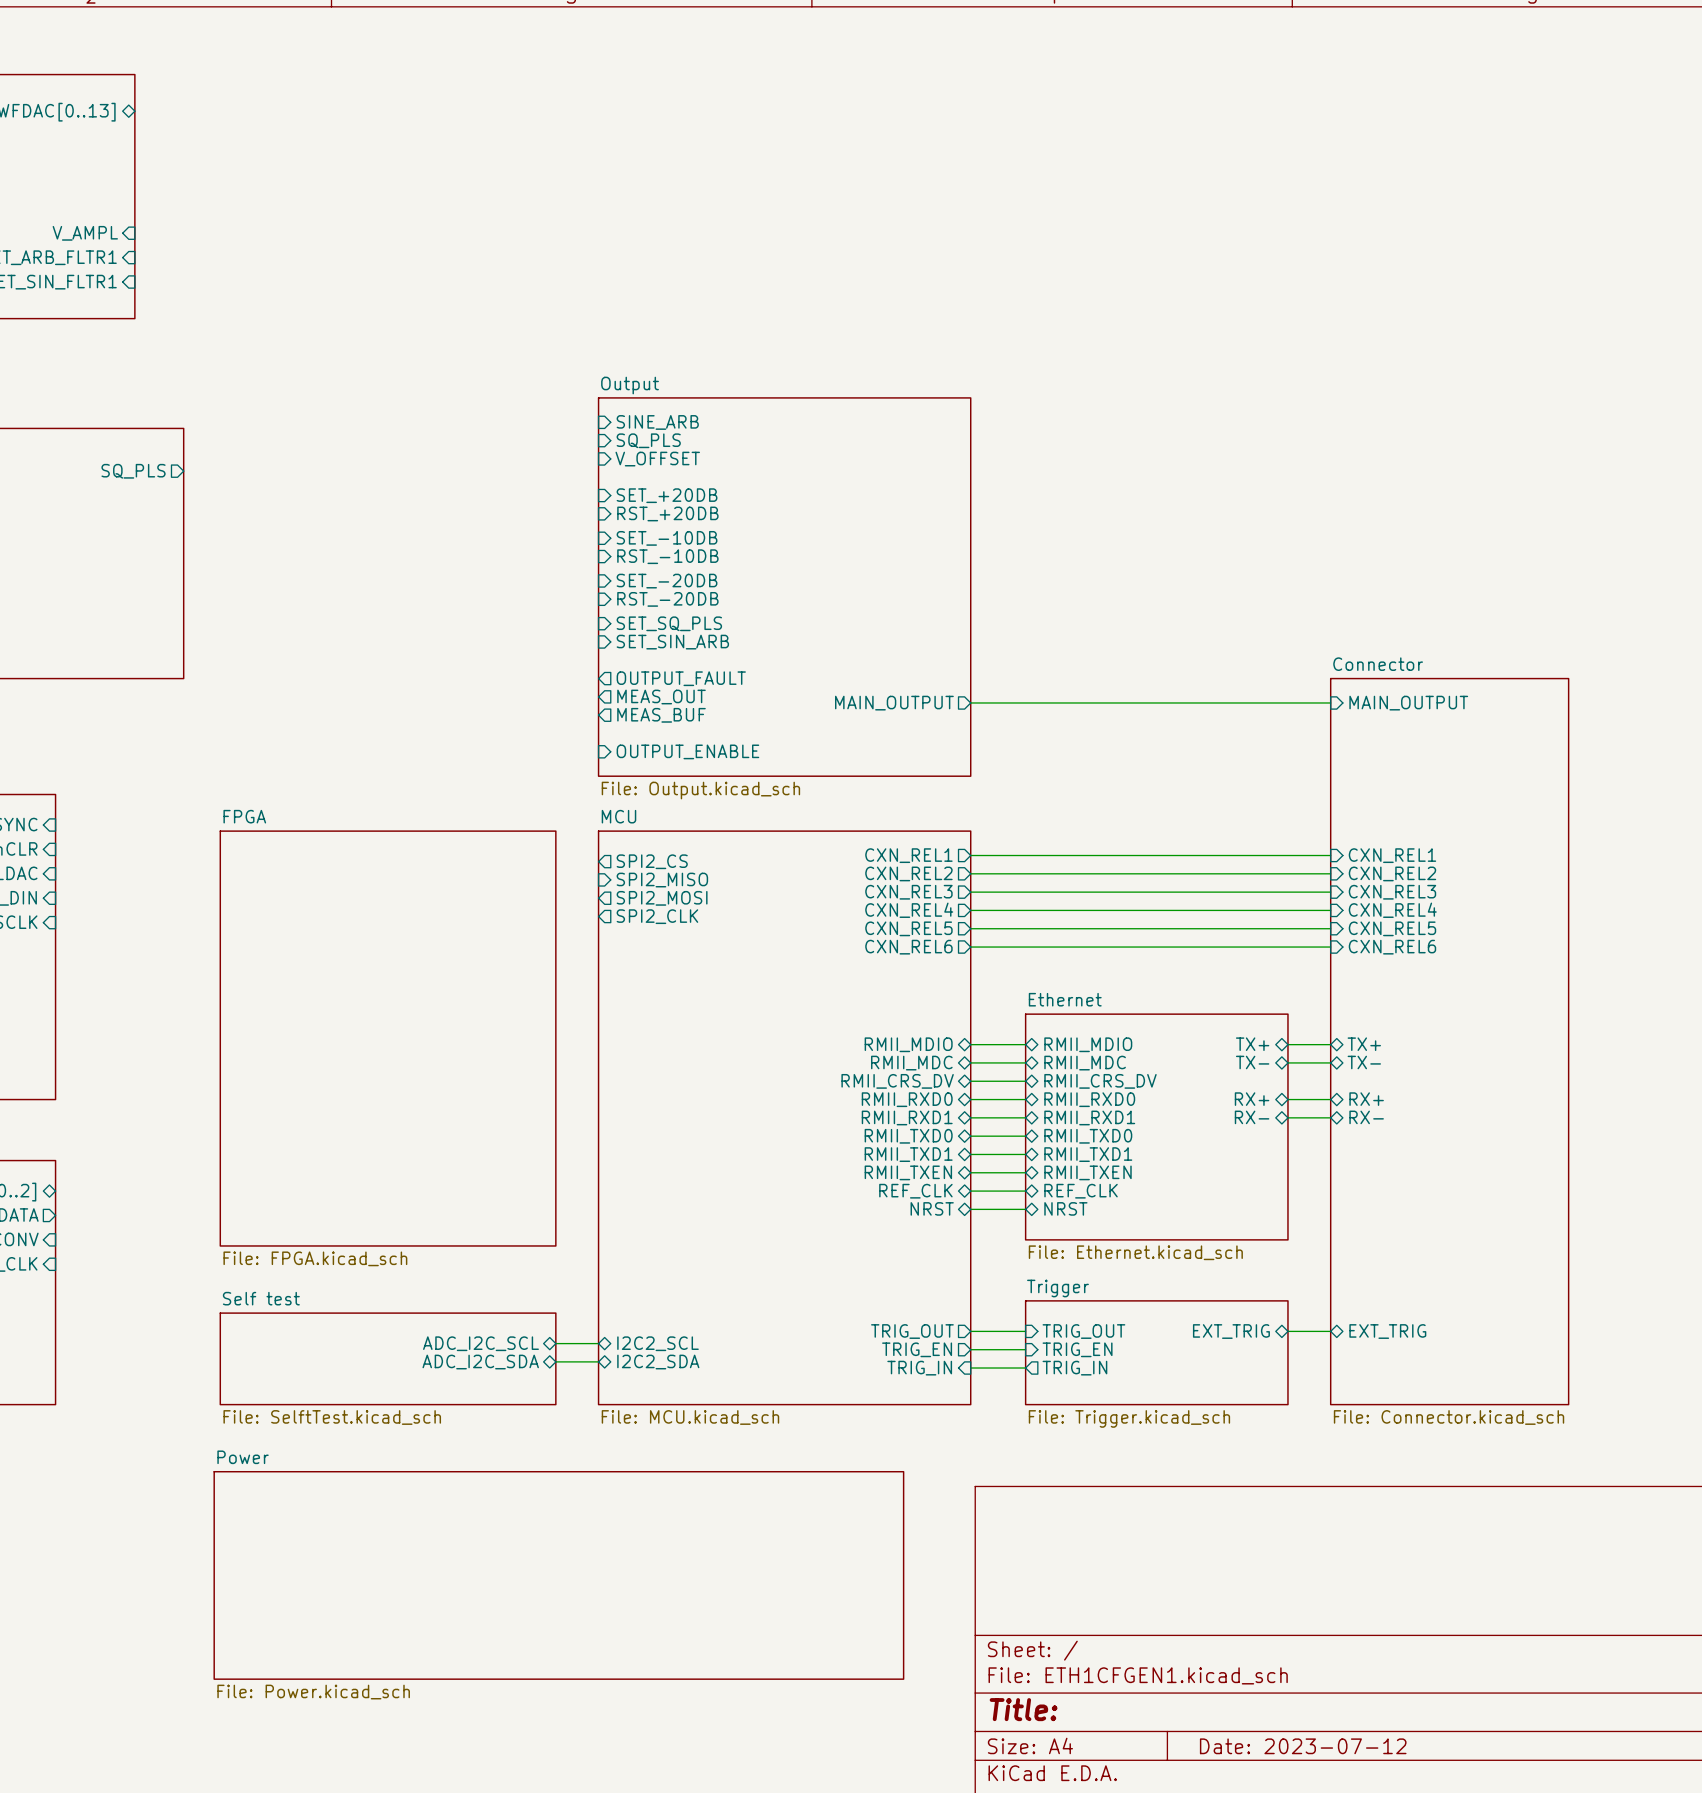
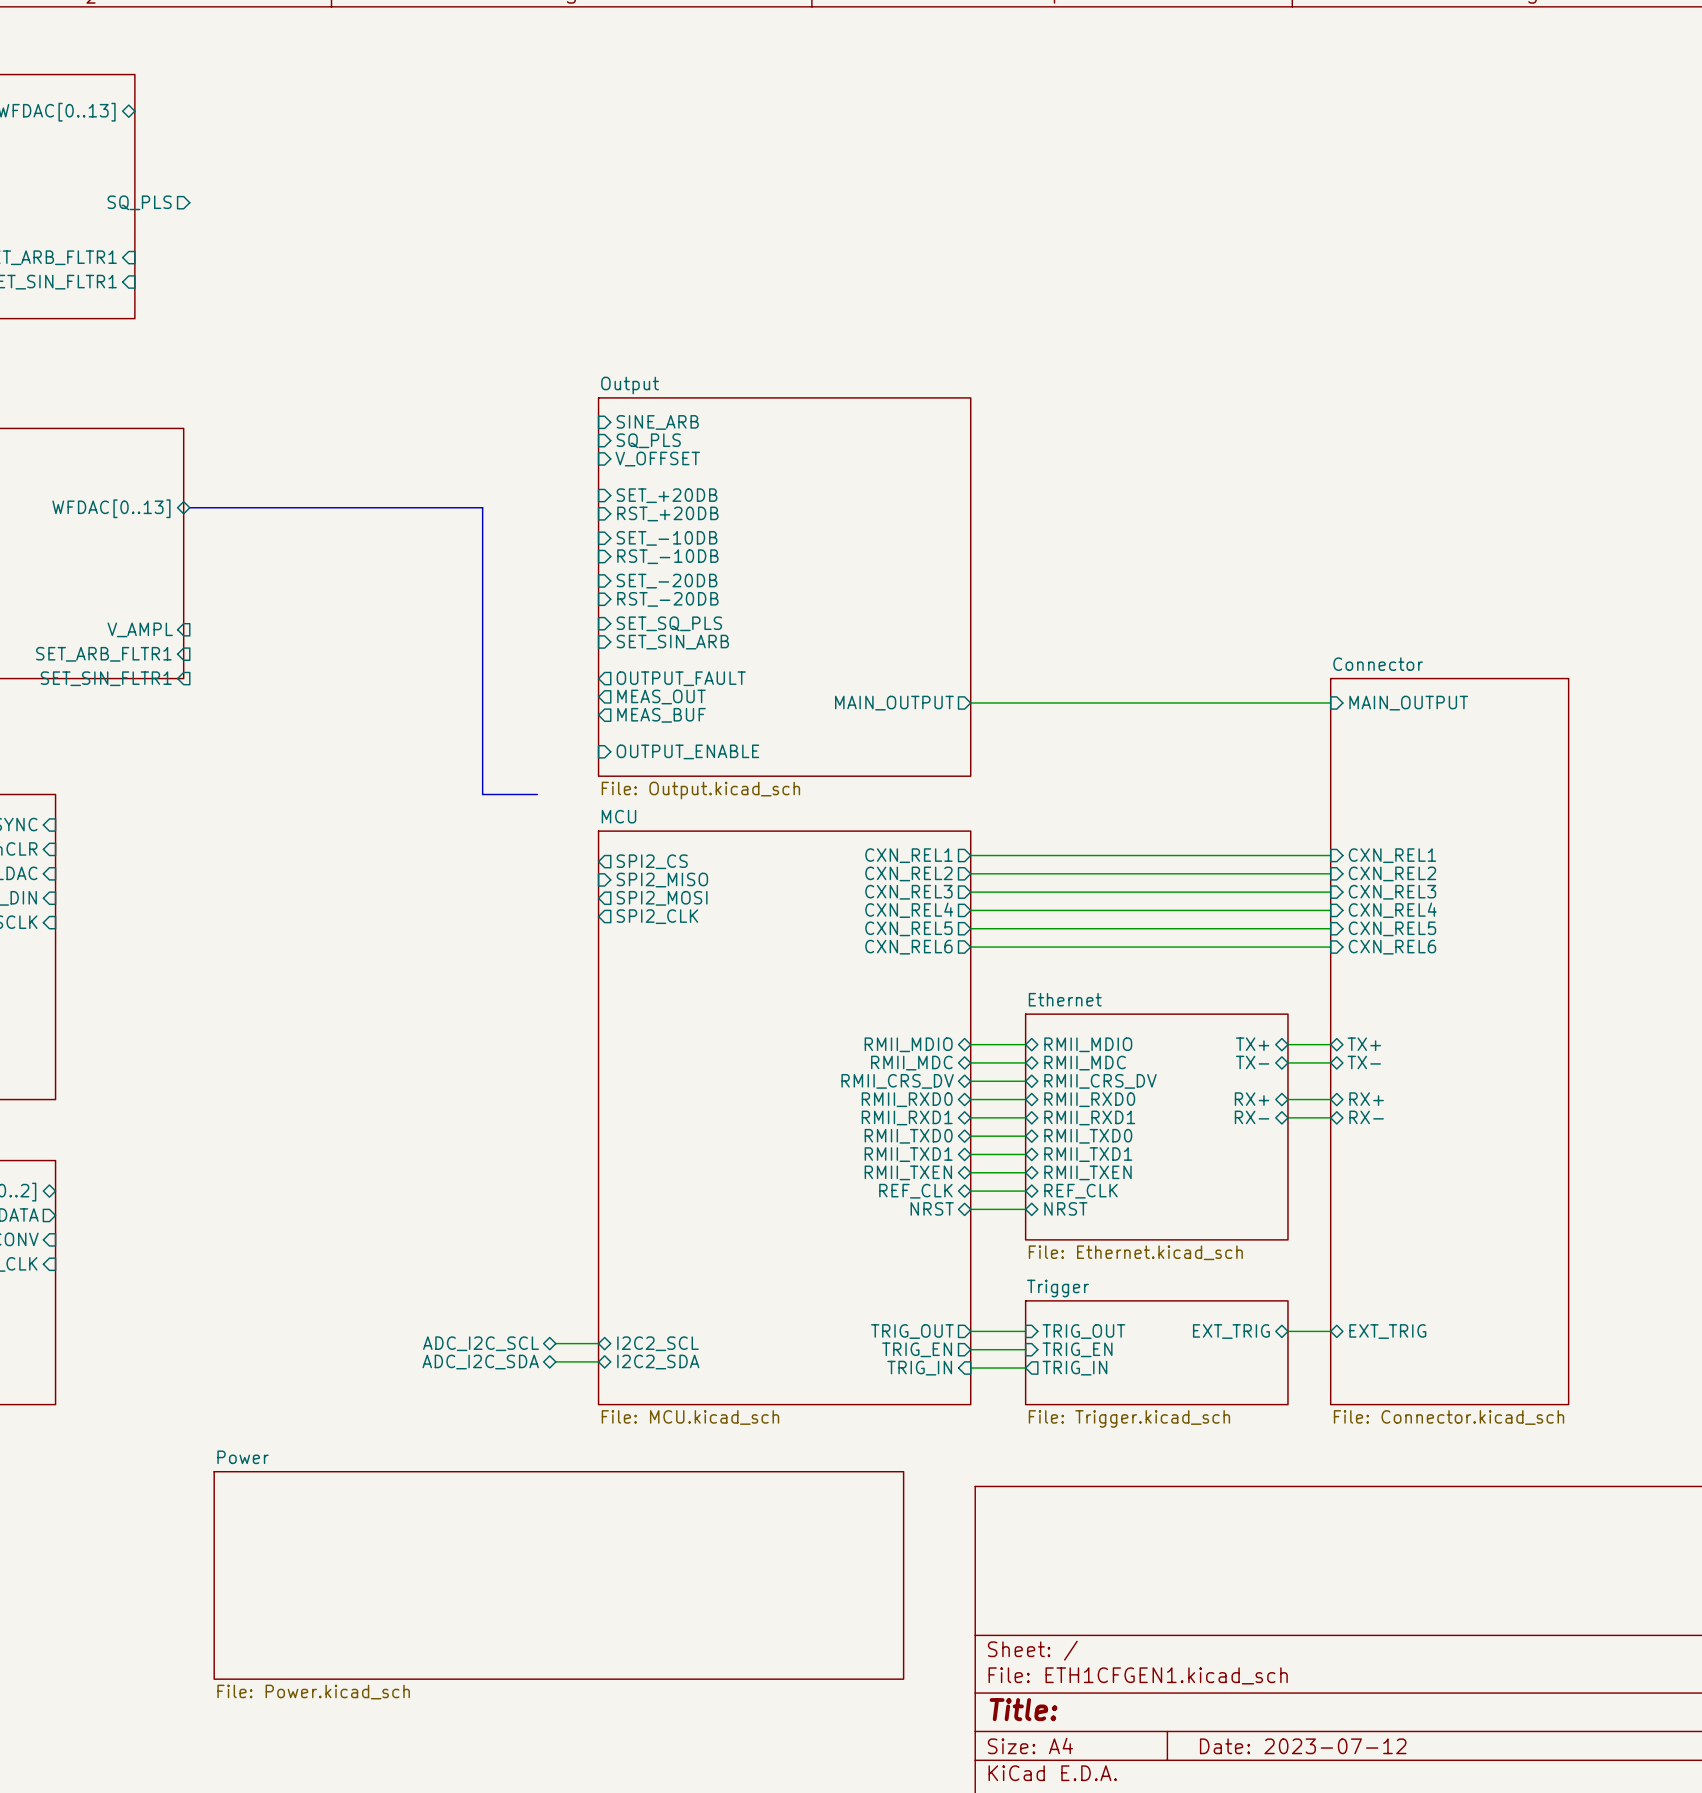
sheet pin: none -> SQ_PLS (139, 202)
sheet pin: V_AMPL (85, 233) -> none
sheet pin: SQ_PLS (133, 471) -> none
bus: none -> (189, 507) (482, 507) (482, 794) (537, 794)
sheet pin: none -> WFDAC[0..13] (111, 508)
sheet pin: none -> V_AMPL (140, 629)
sheet pin: none -> SET_ARB_FLTR1 (103, 654)
sheet pin: none -> SET_SIN_FLTR1 (106, 678)
sheet FPGA: File: FPGA.kicad_sch (388, 1038) -> none
sheet Self test: File: SelftTest.kicad_sch (388, 1358) -> none

